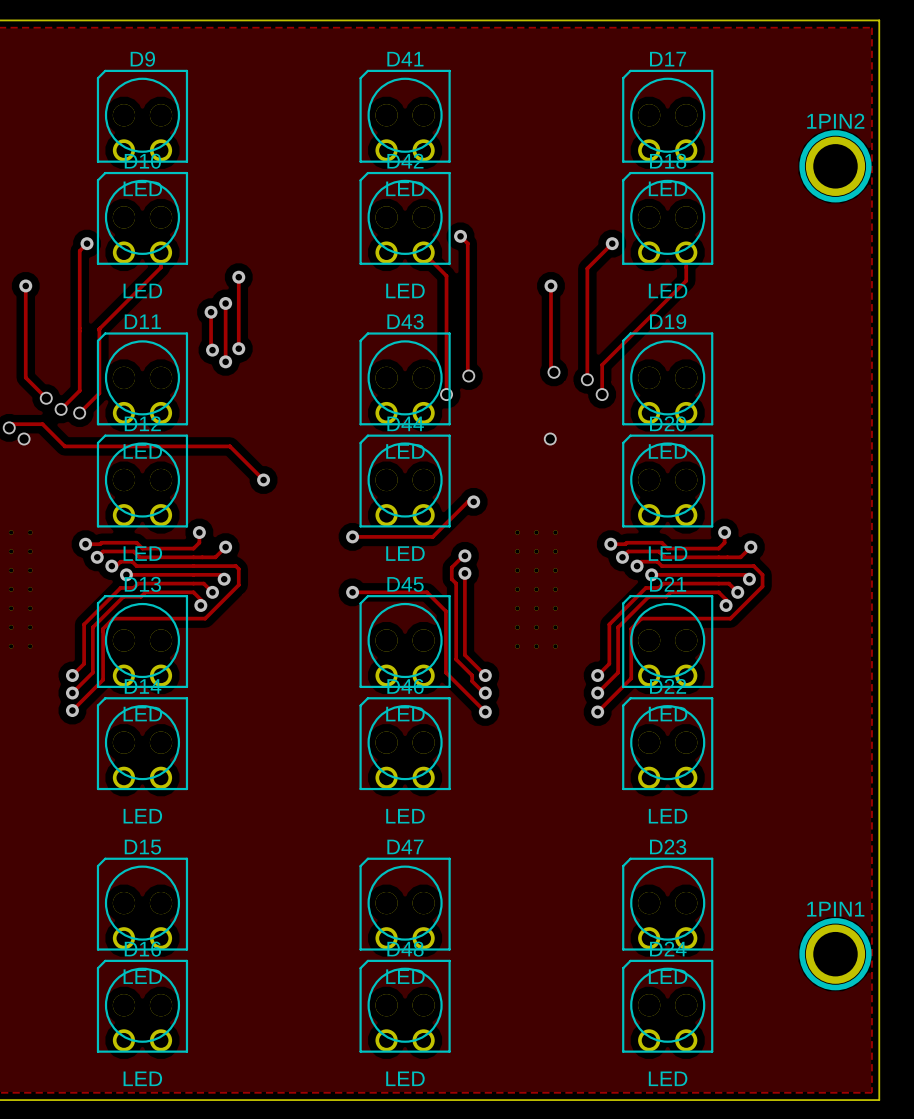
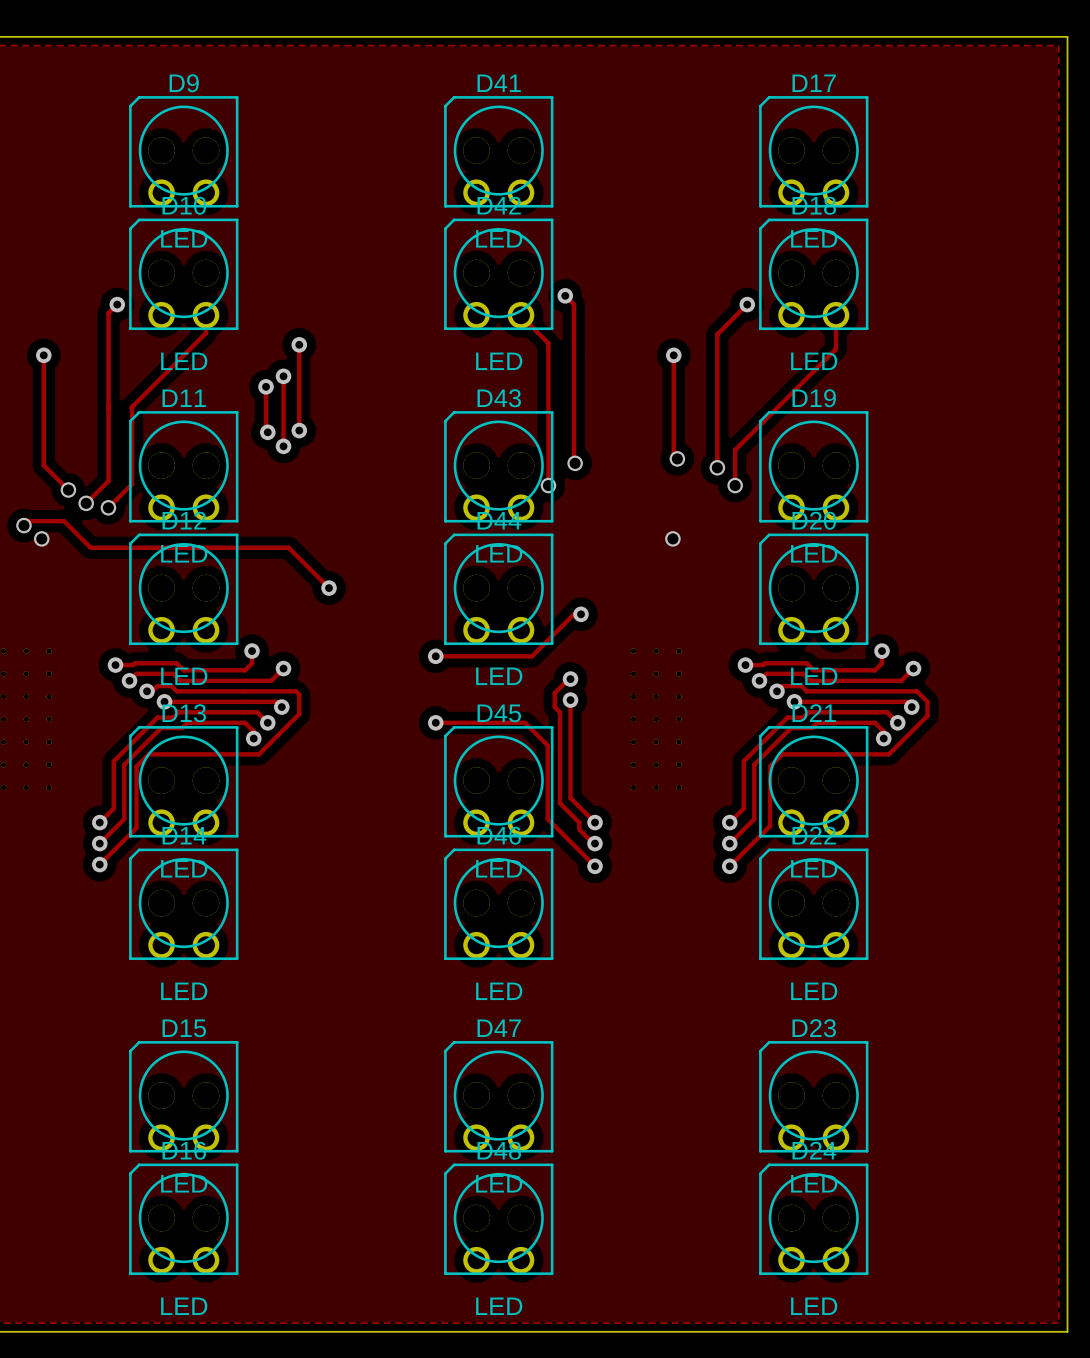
1PIN2: (835, 166) -> none
1PIN1: (835, 954) -> none

